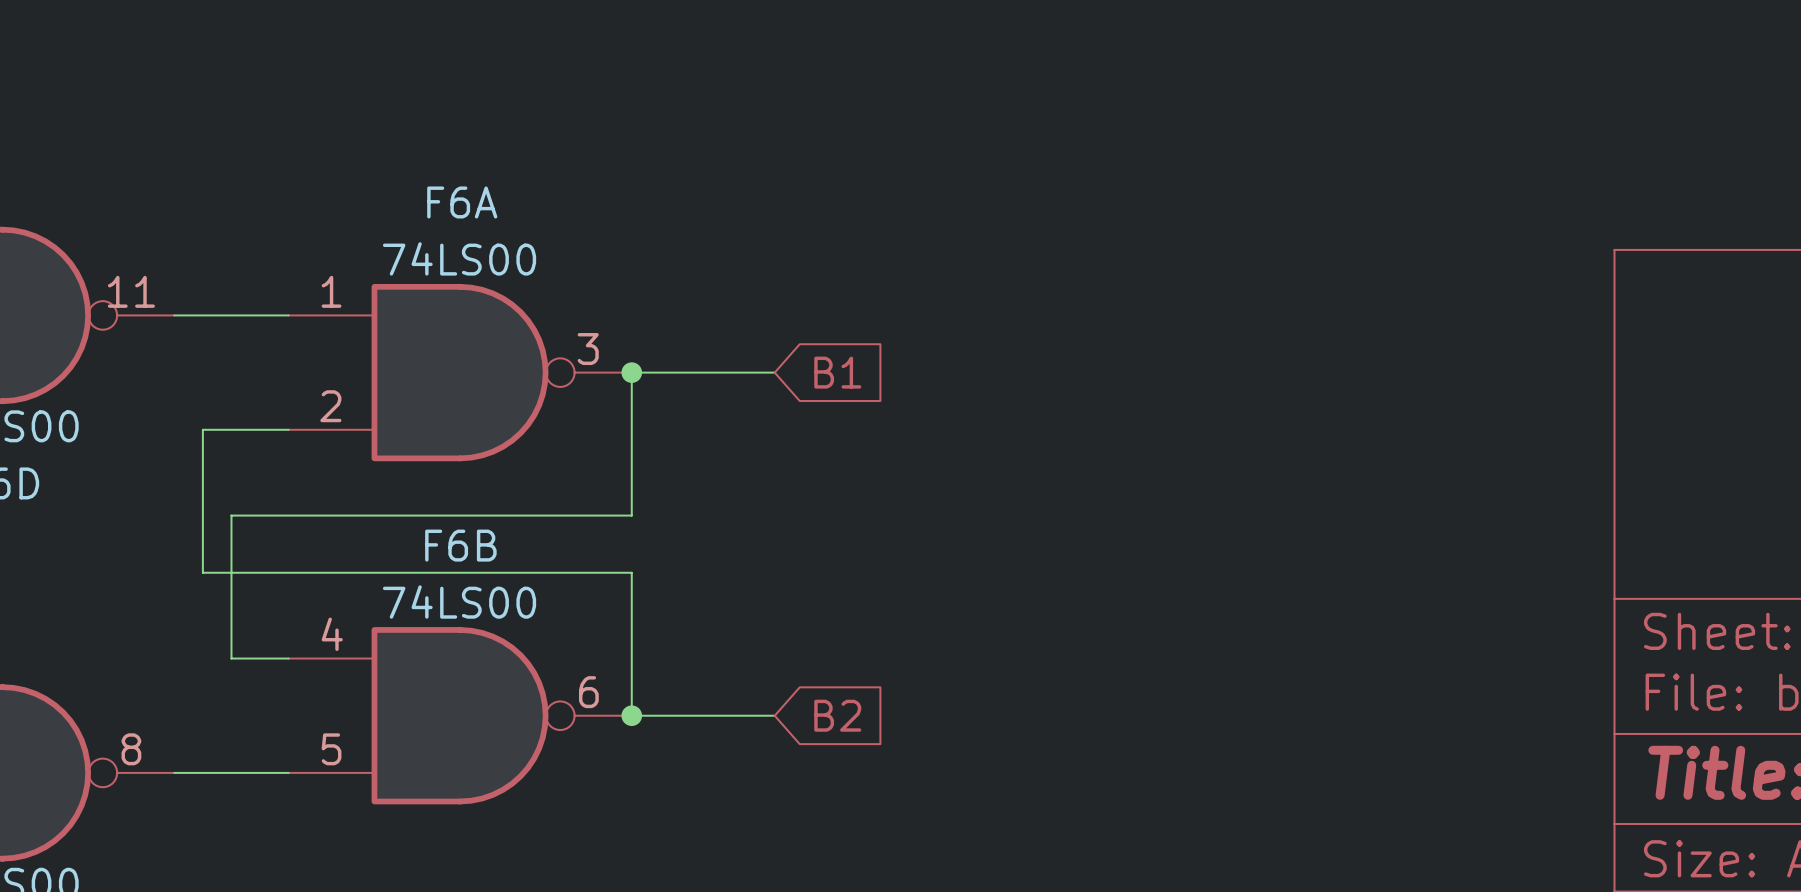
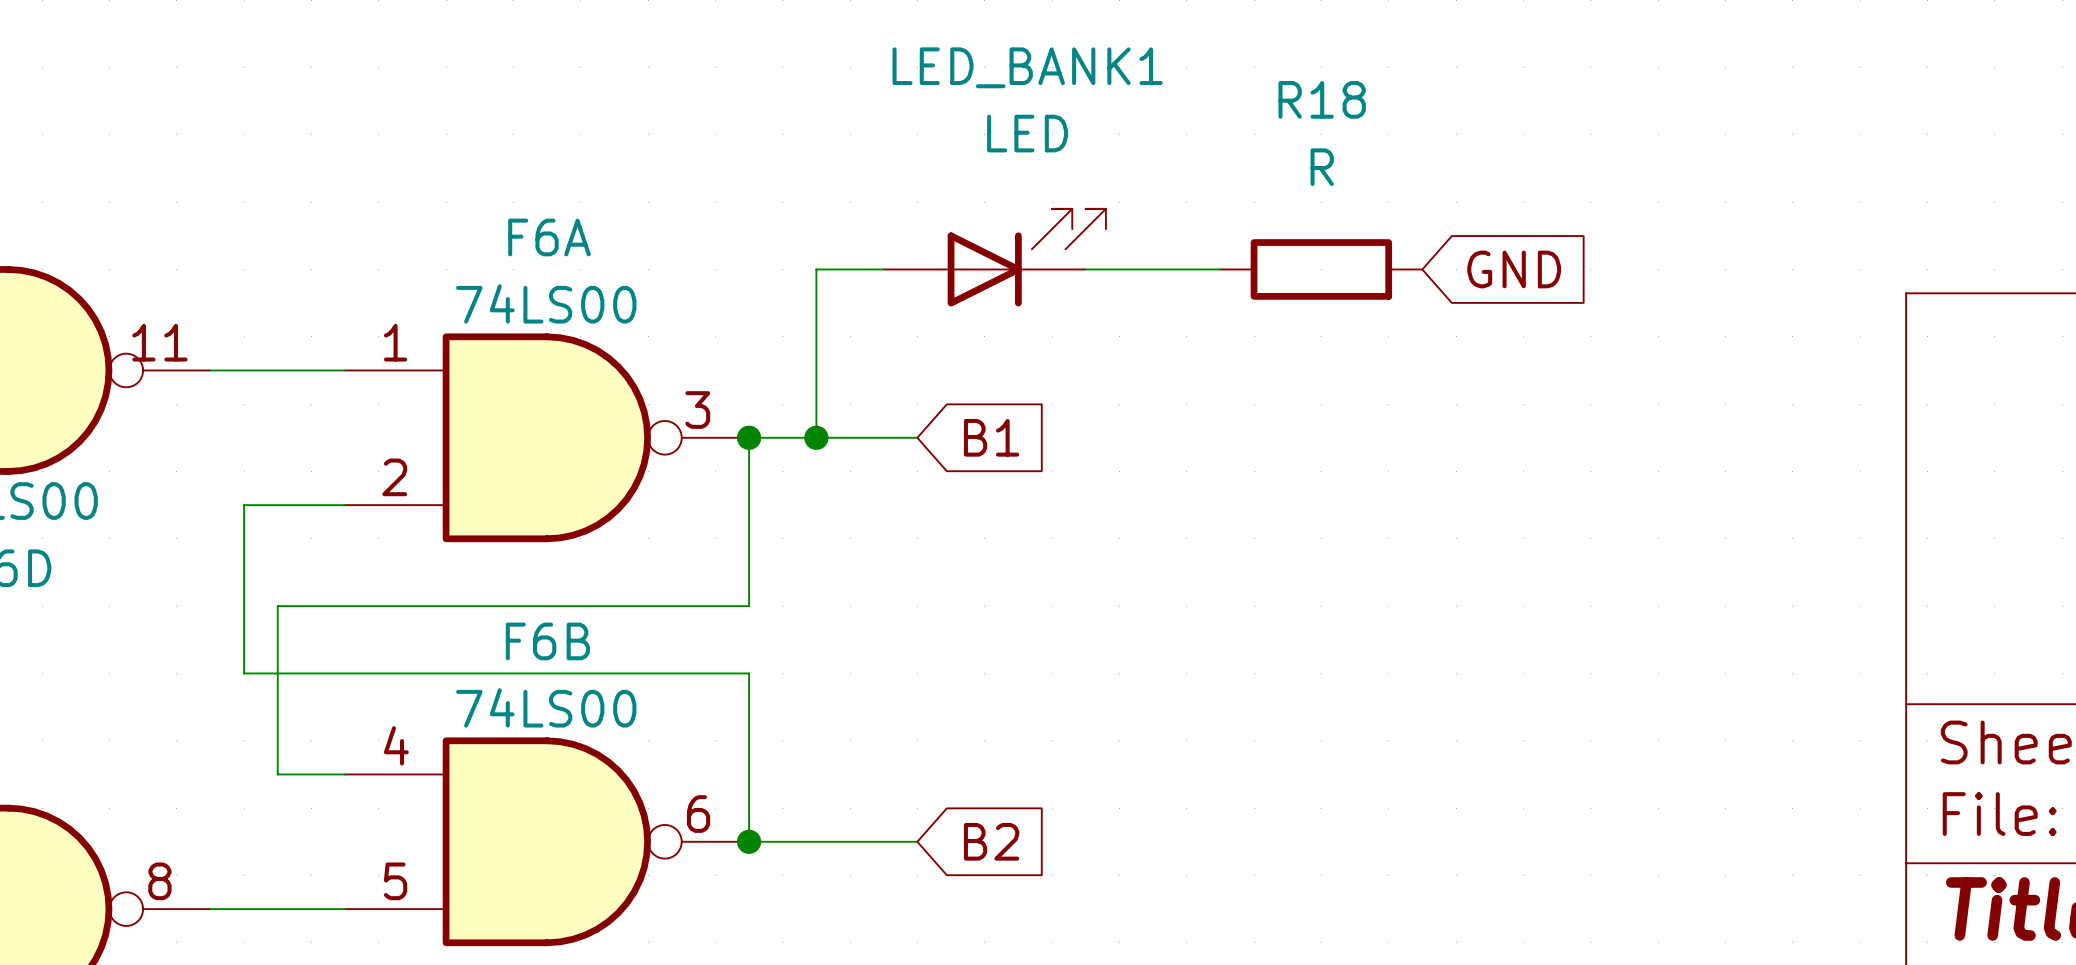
LED_BANK1: none -> LED (994, 257)
wire: none -> (883, 269) (816, 269) (816, 437)
wire: none -> (1085, 269) (1220, 269)
R18: none -> R (1321, 269)
global label: none -> GND (1514, 269)
junction: none -> (816, 437)

